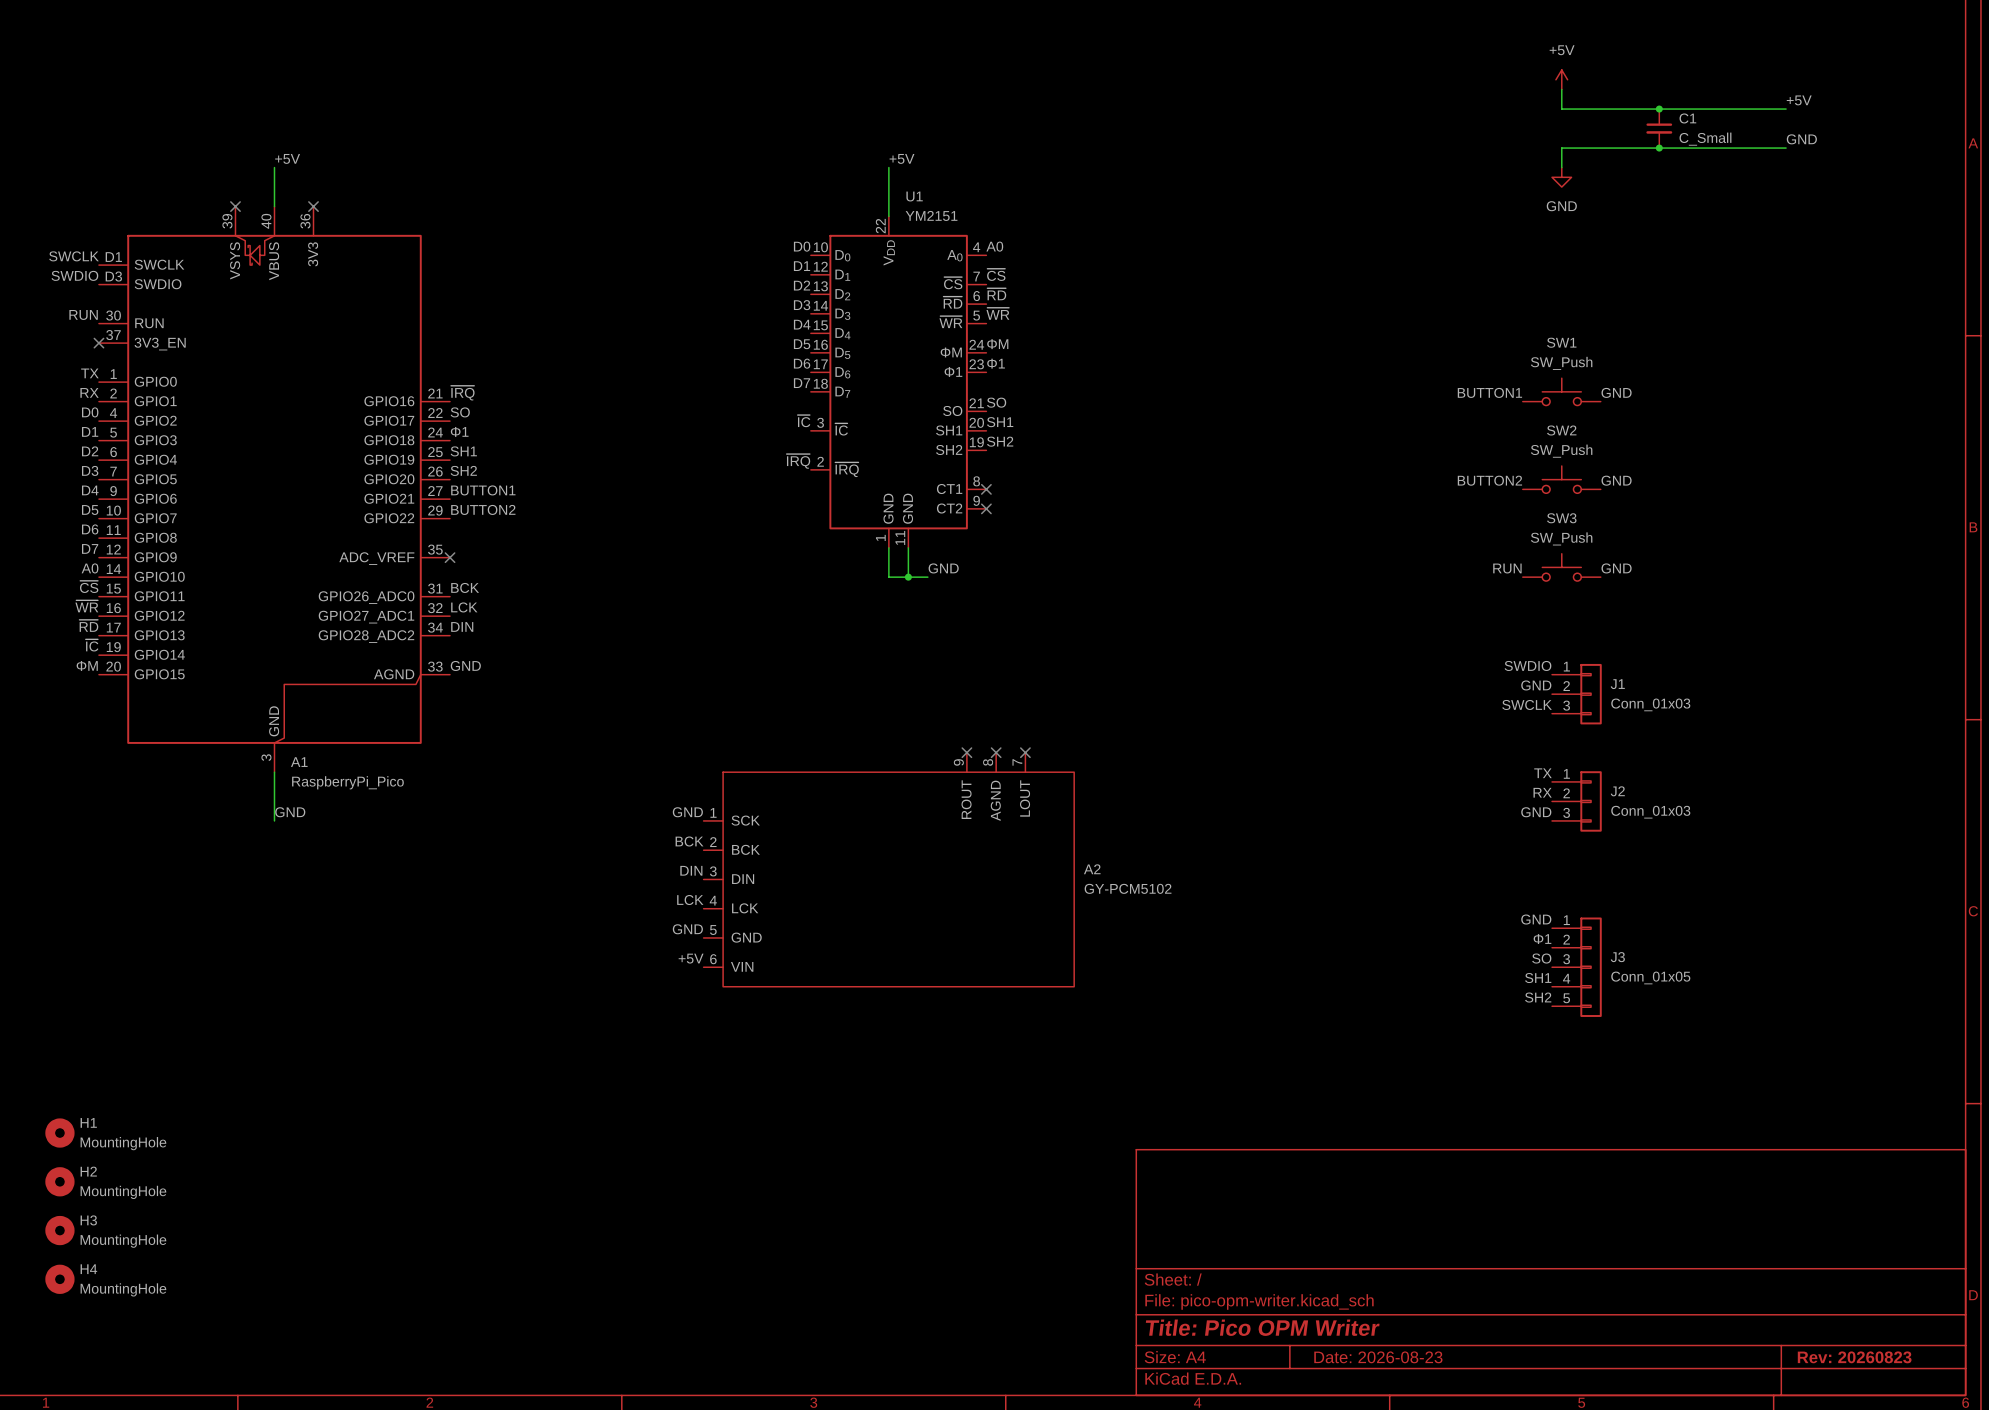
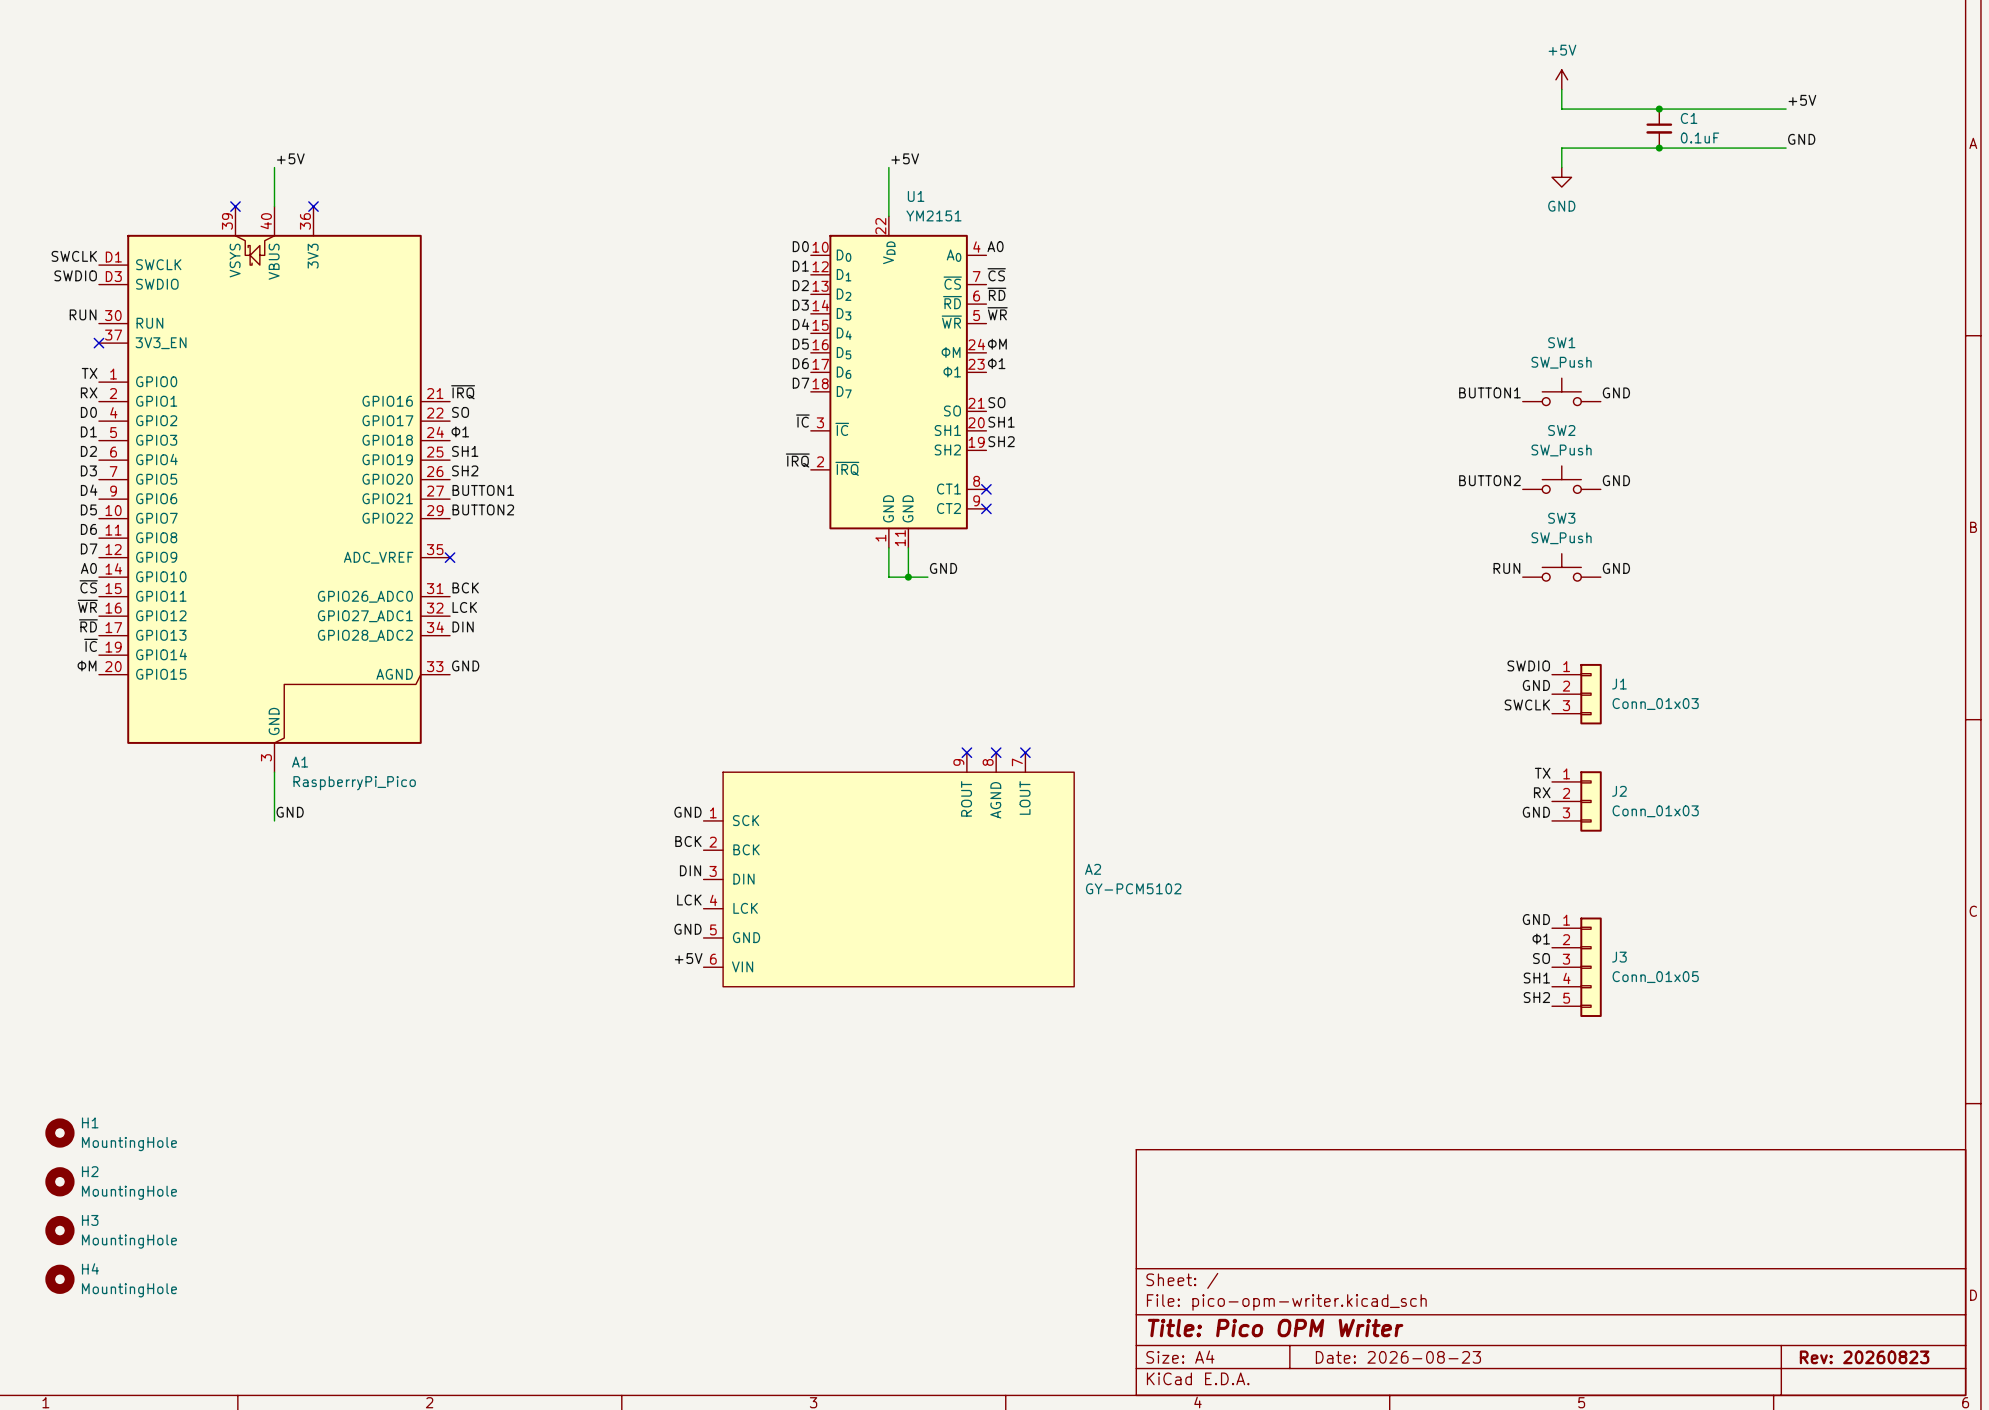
C1 value: C_Small (1705, 139) -> 0.1uF (1700, 137)

